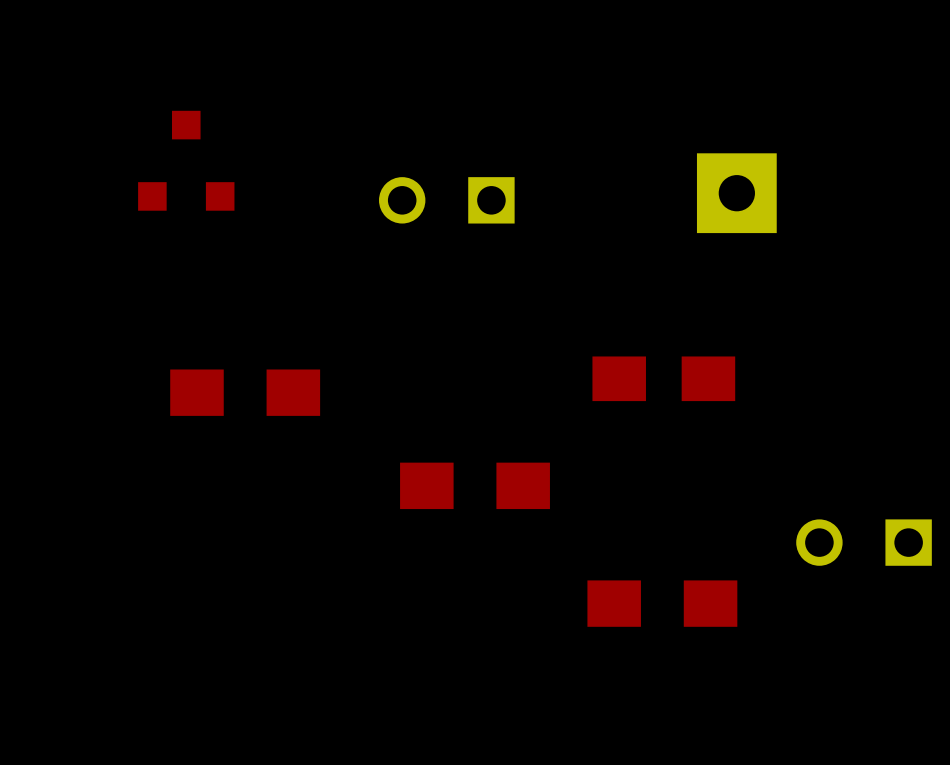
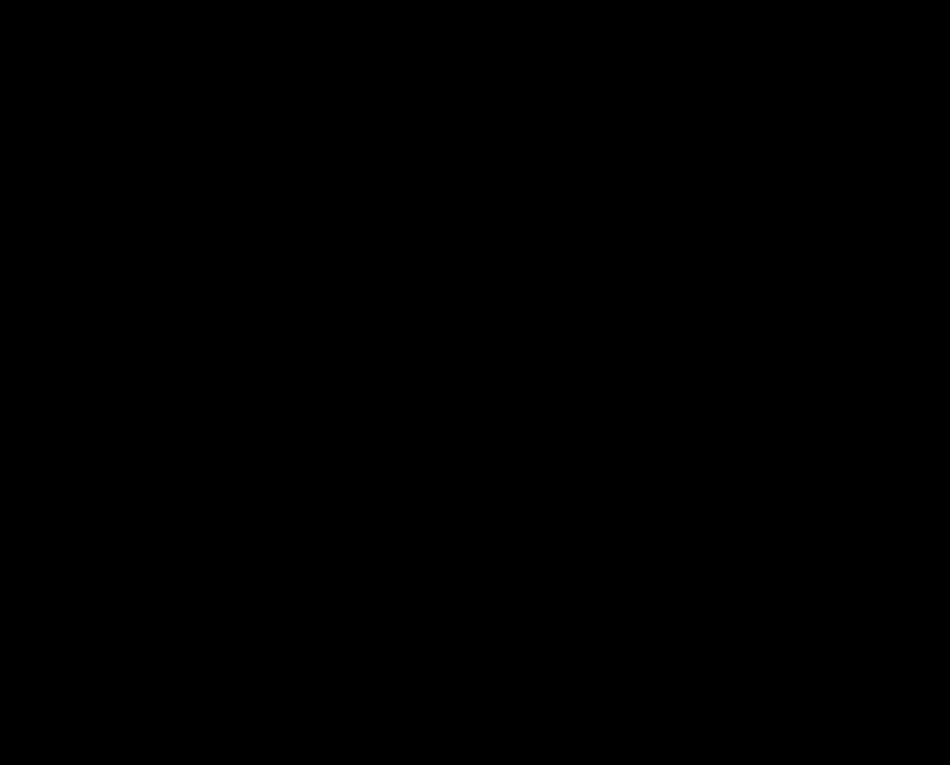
part: (186, 160) -> none
part: (736, 193) -> none
part: (446, 200) -> none
part: (663, 378) -> none
part: (245, 392) -> none
part: (475, 485) -> none
part: (864, 542) -> none
part: (662, 603) -> none

